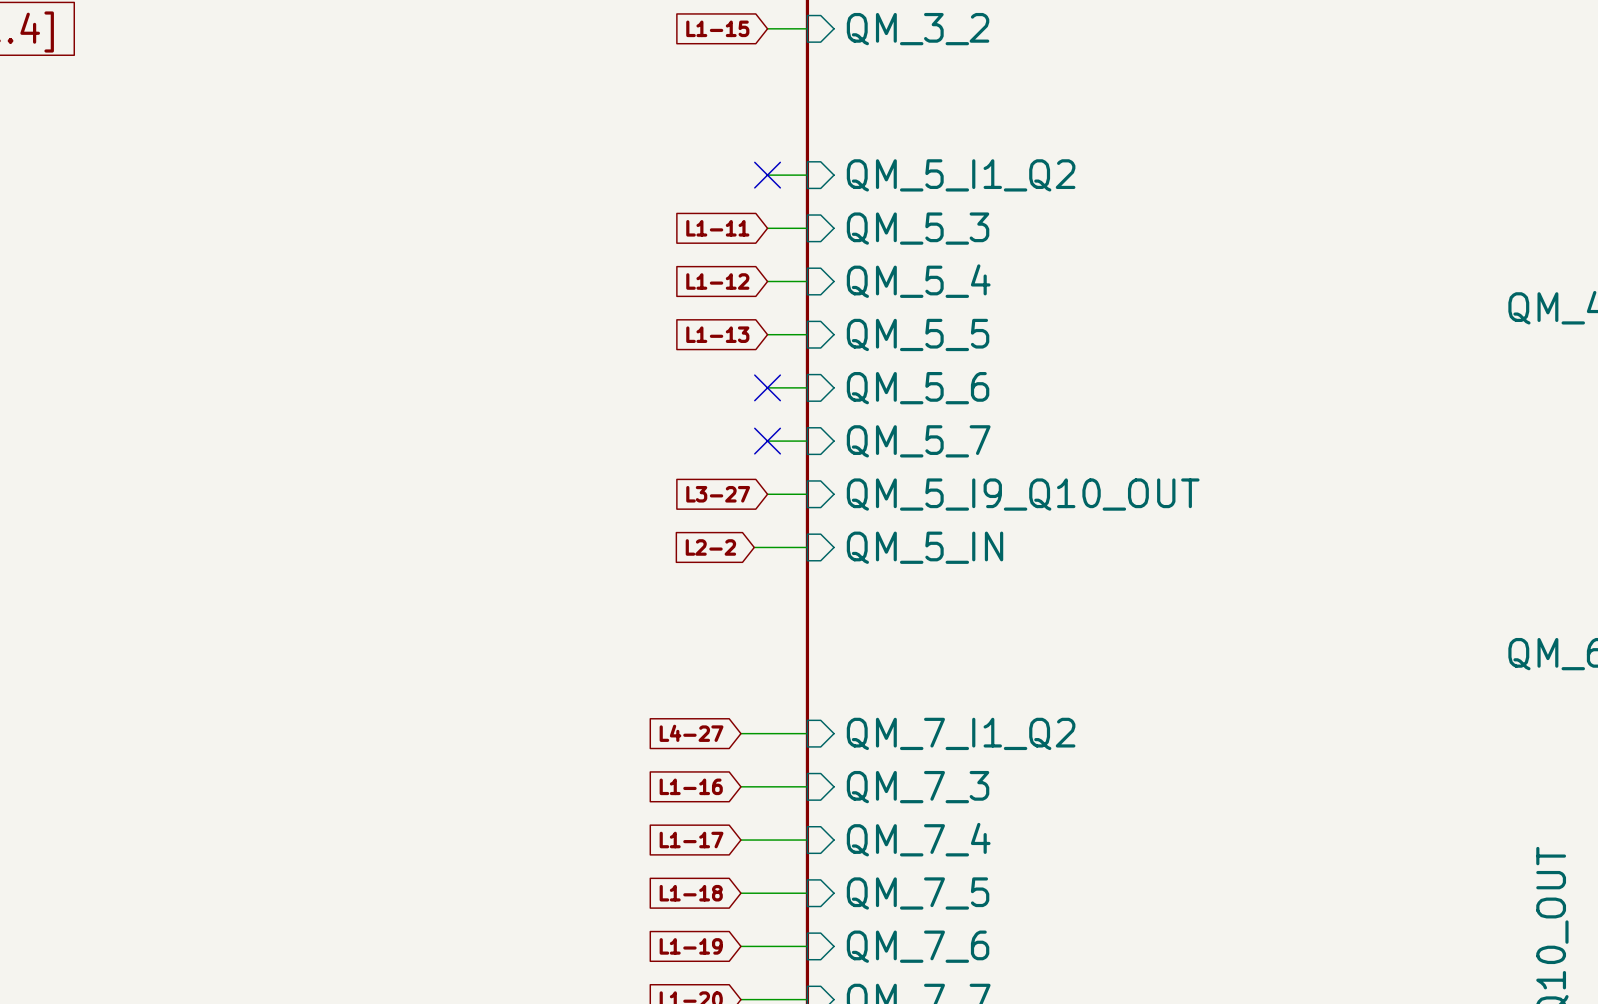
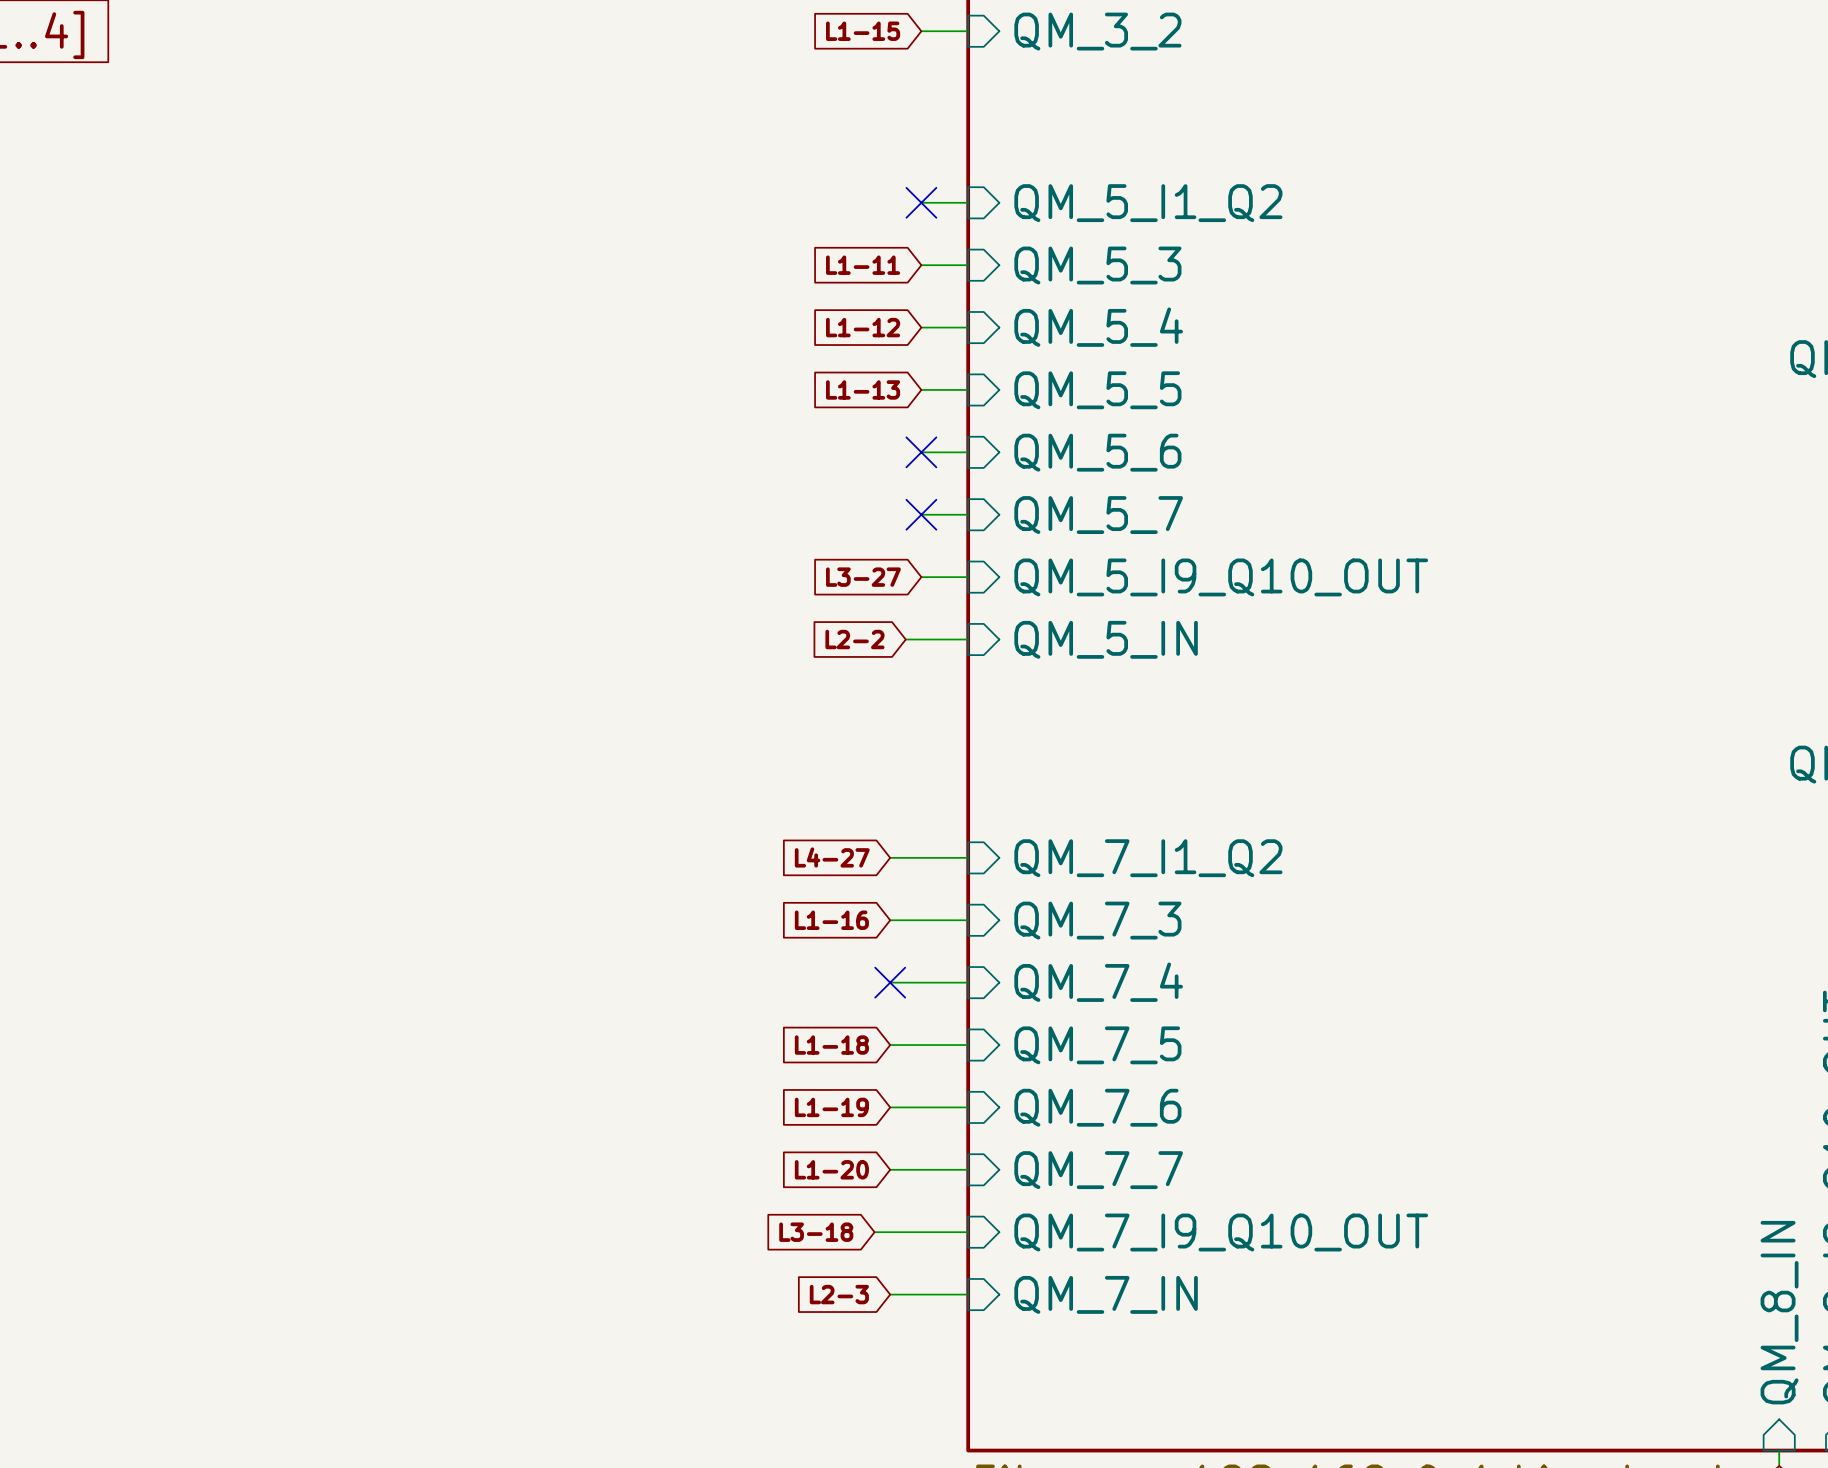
global label: L1-17 (691, 840) -> none
no-connect mark: none -> (890, 982)

